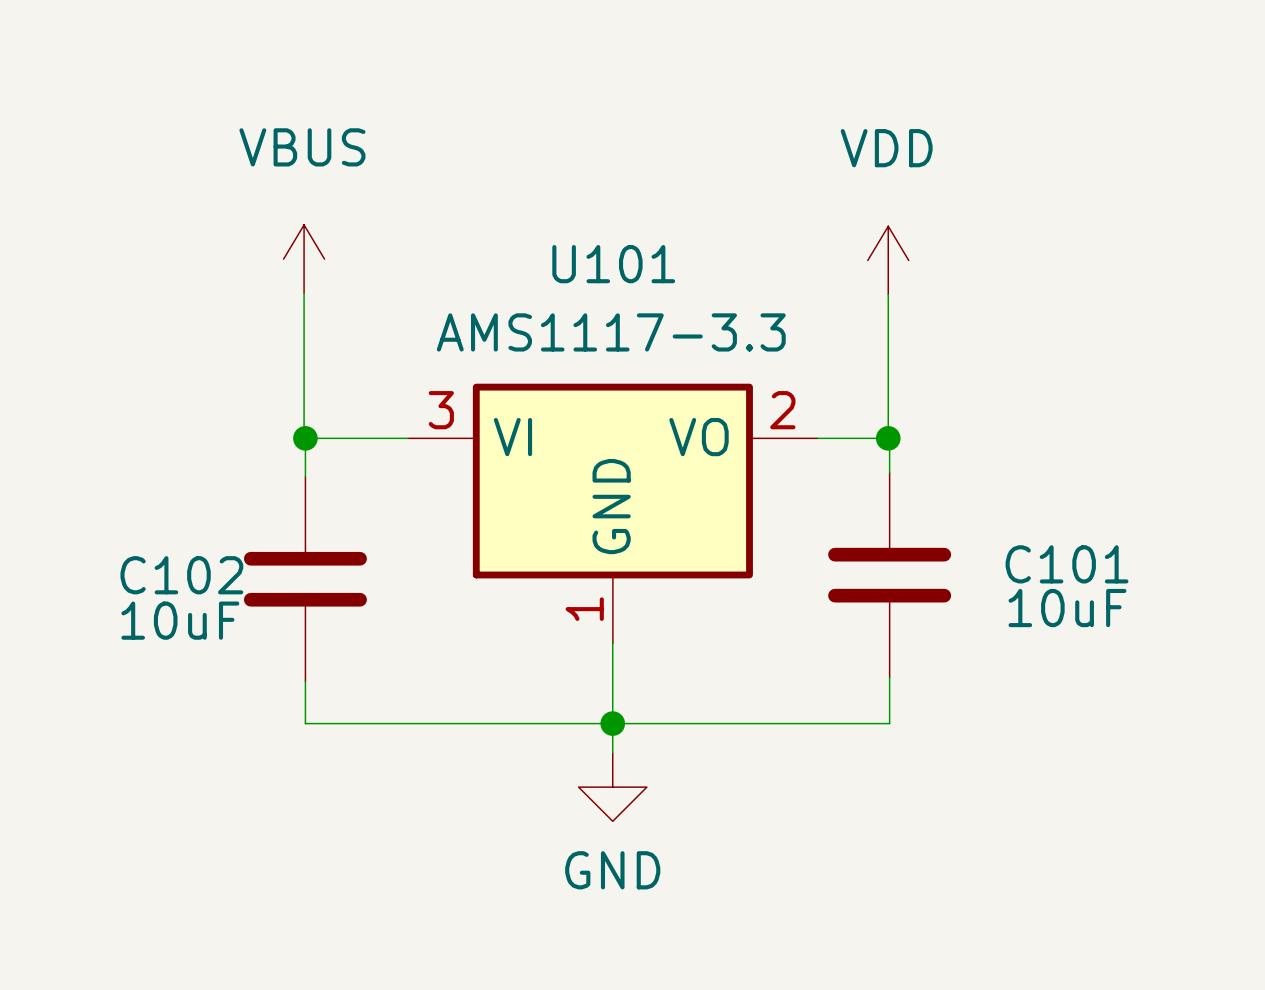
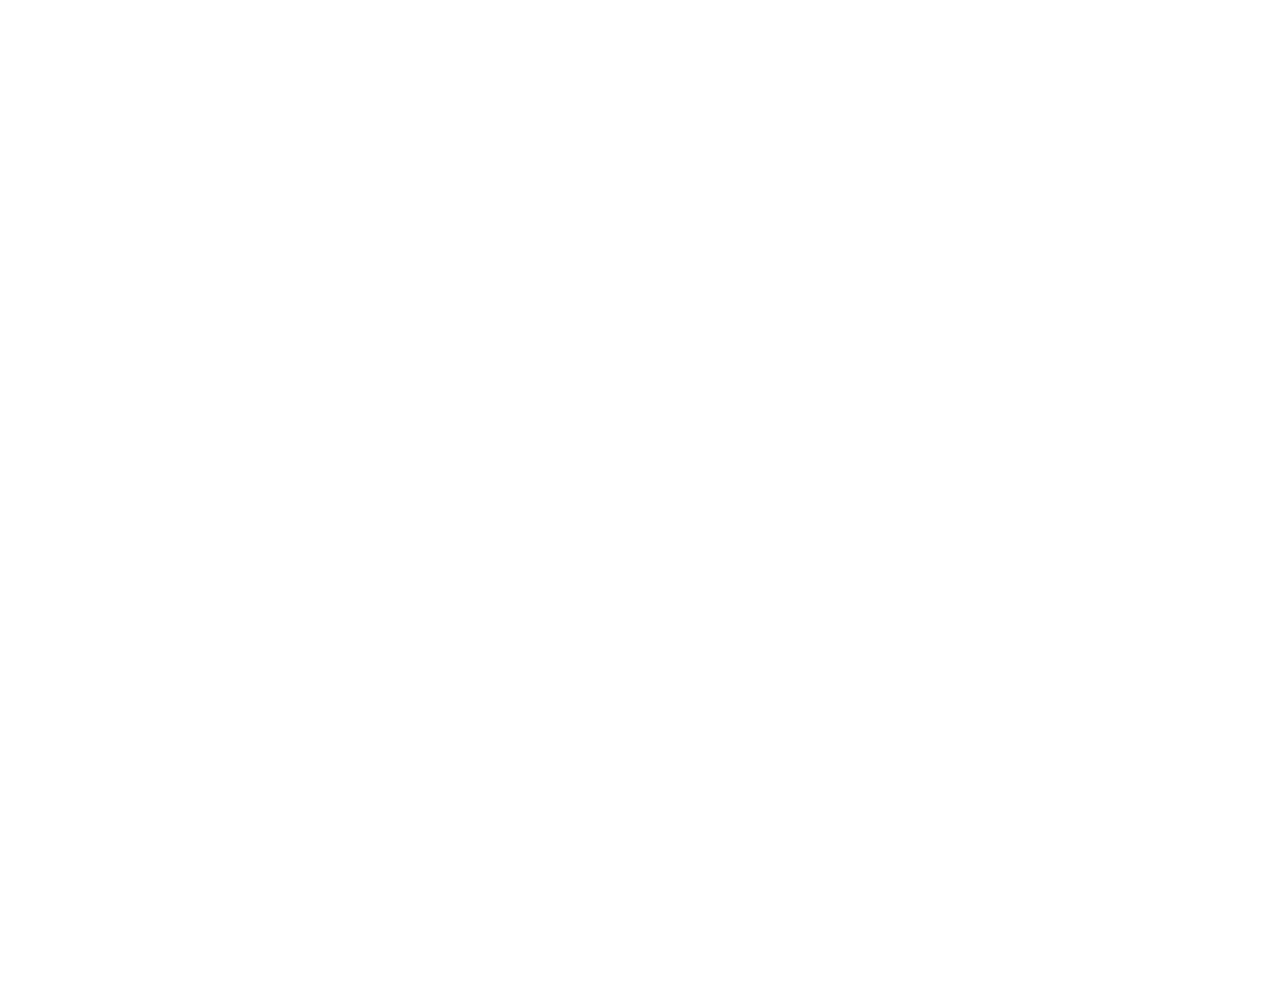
power symbol: VBUS (304, 259) -> none
power symbol: VDD (888, 260) -> none
wire: (304, 293) (304, 438) (407, 438) -> none
wire: (888, 294) (888, 438) -> none
wire: (305, 438) (305, 476) -> none
junction: (305, 438) -> none
wire: (817, 438) (889, 438) (889, 472) -> none
junction: (888, 438) -> none
U101: AMS1117-3.3 (612, 513) -> none
C101: 10uF (889, 575) -> none
C102: 10uF (305, 579) -> none
wire: (612, 643) (612, 752) -> none
wire: (889, 677) (889, 723) (305, 723) (305, 681) -> none
junction: (612, 723) -> none
power symbol: GND (612, 787) -> none

